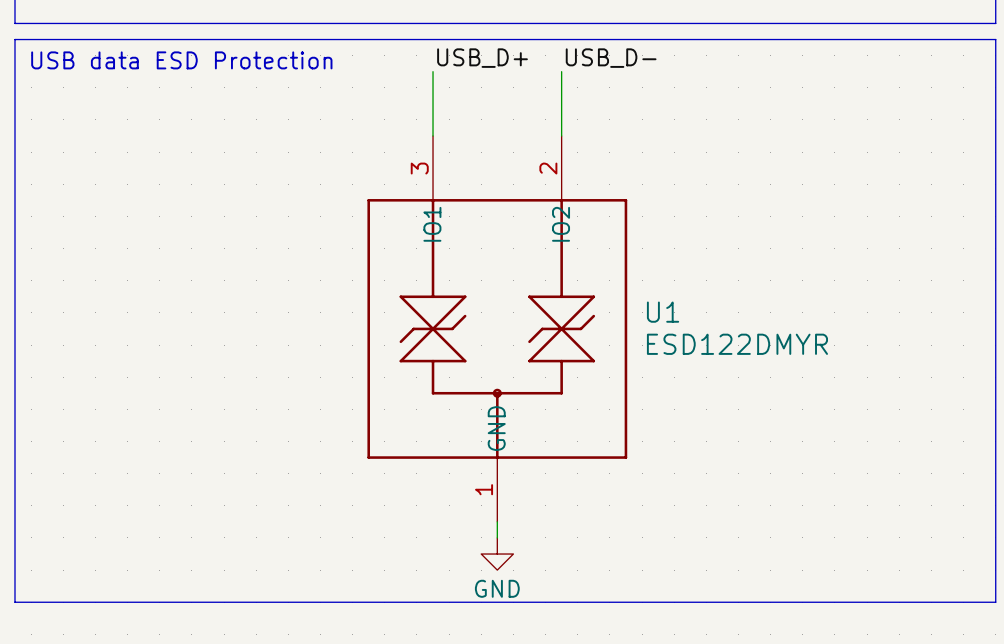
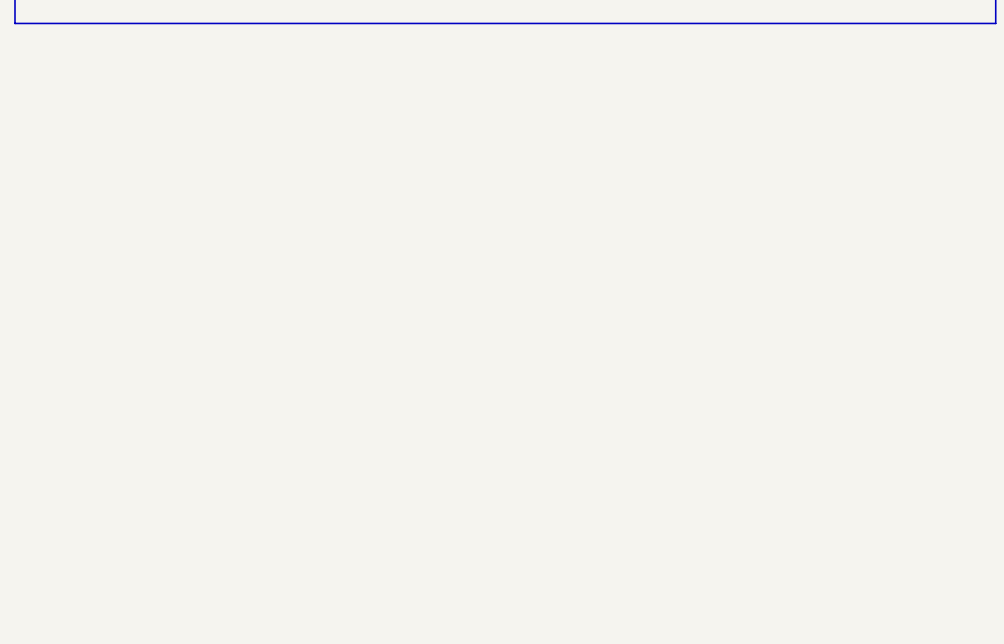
line: (14, 39) (995, 39) (995, 602) (14, 602) (14, 39) -> none
label: USB_D+ (482, 58) -> none
label: USB_D- (611, 58) -> none
text: USB data ESD Protection (181, 60) -> none
wire: (433, 71) (433, 136) -> none
wire: (561, 71) (561, 136) -> none
U1: ESD122DMYR (497, 328) -> none
wire: (497, 521) (497, 537) -> none
power symbol: GND (497, 554) -> none

